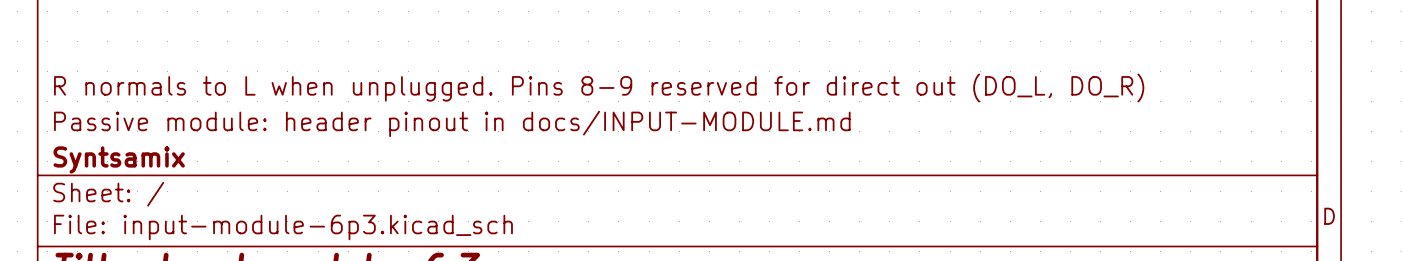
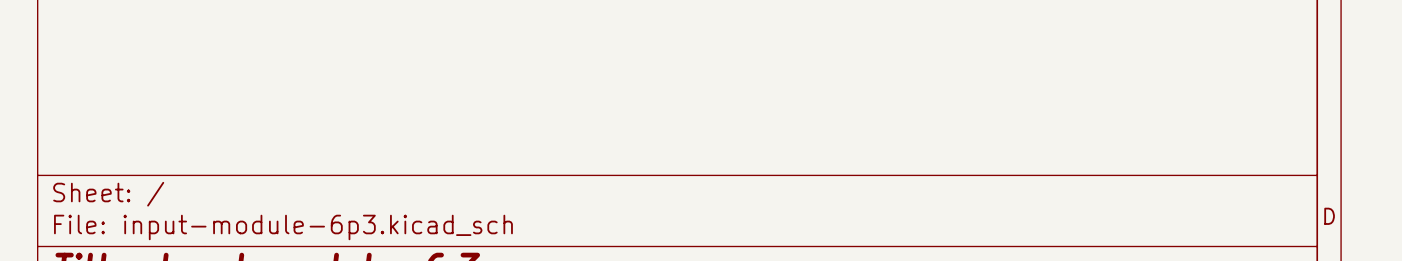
title block: R normals to L when unplugged. Pins 8-9 reserved for direct out (DO_L, DO_R) (599, 87) -> none
title block: Passive module: header pinout in docs/INPUT-MODULE.md (452, 123) -> none
title block: Syntsamix (119, 159) -> none

